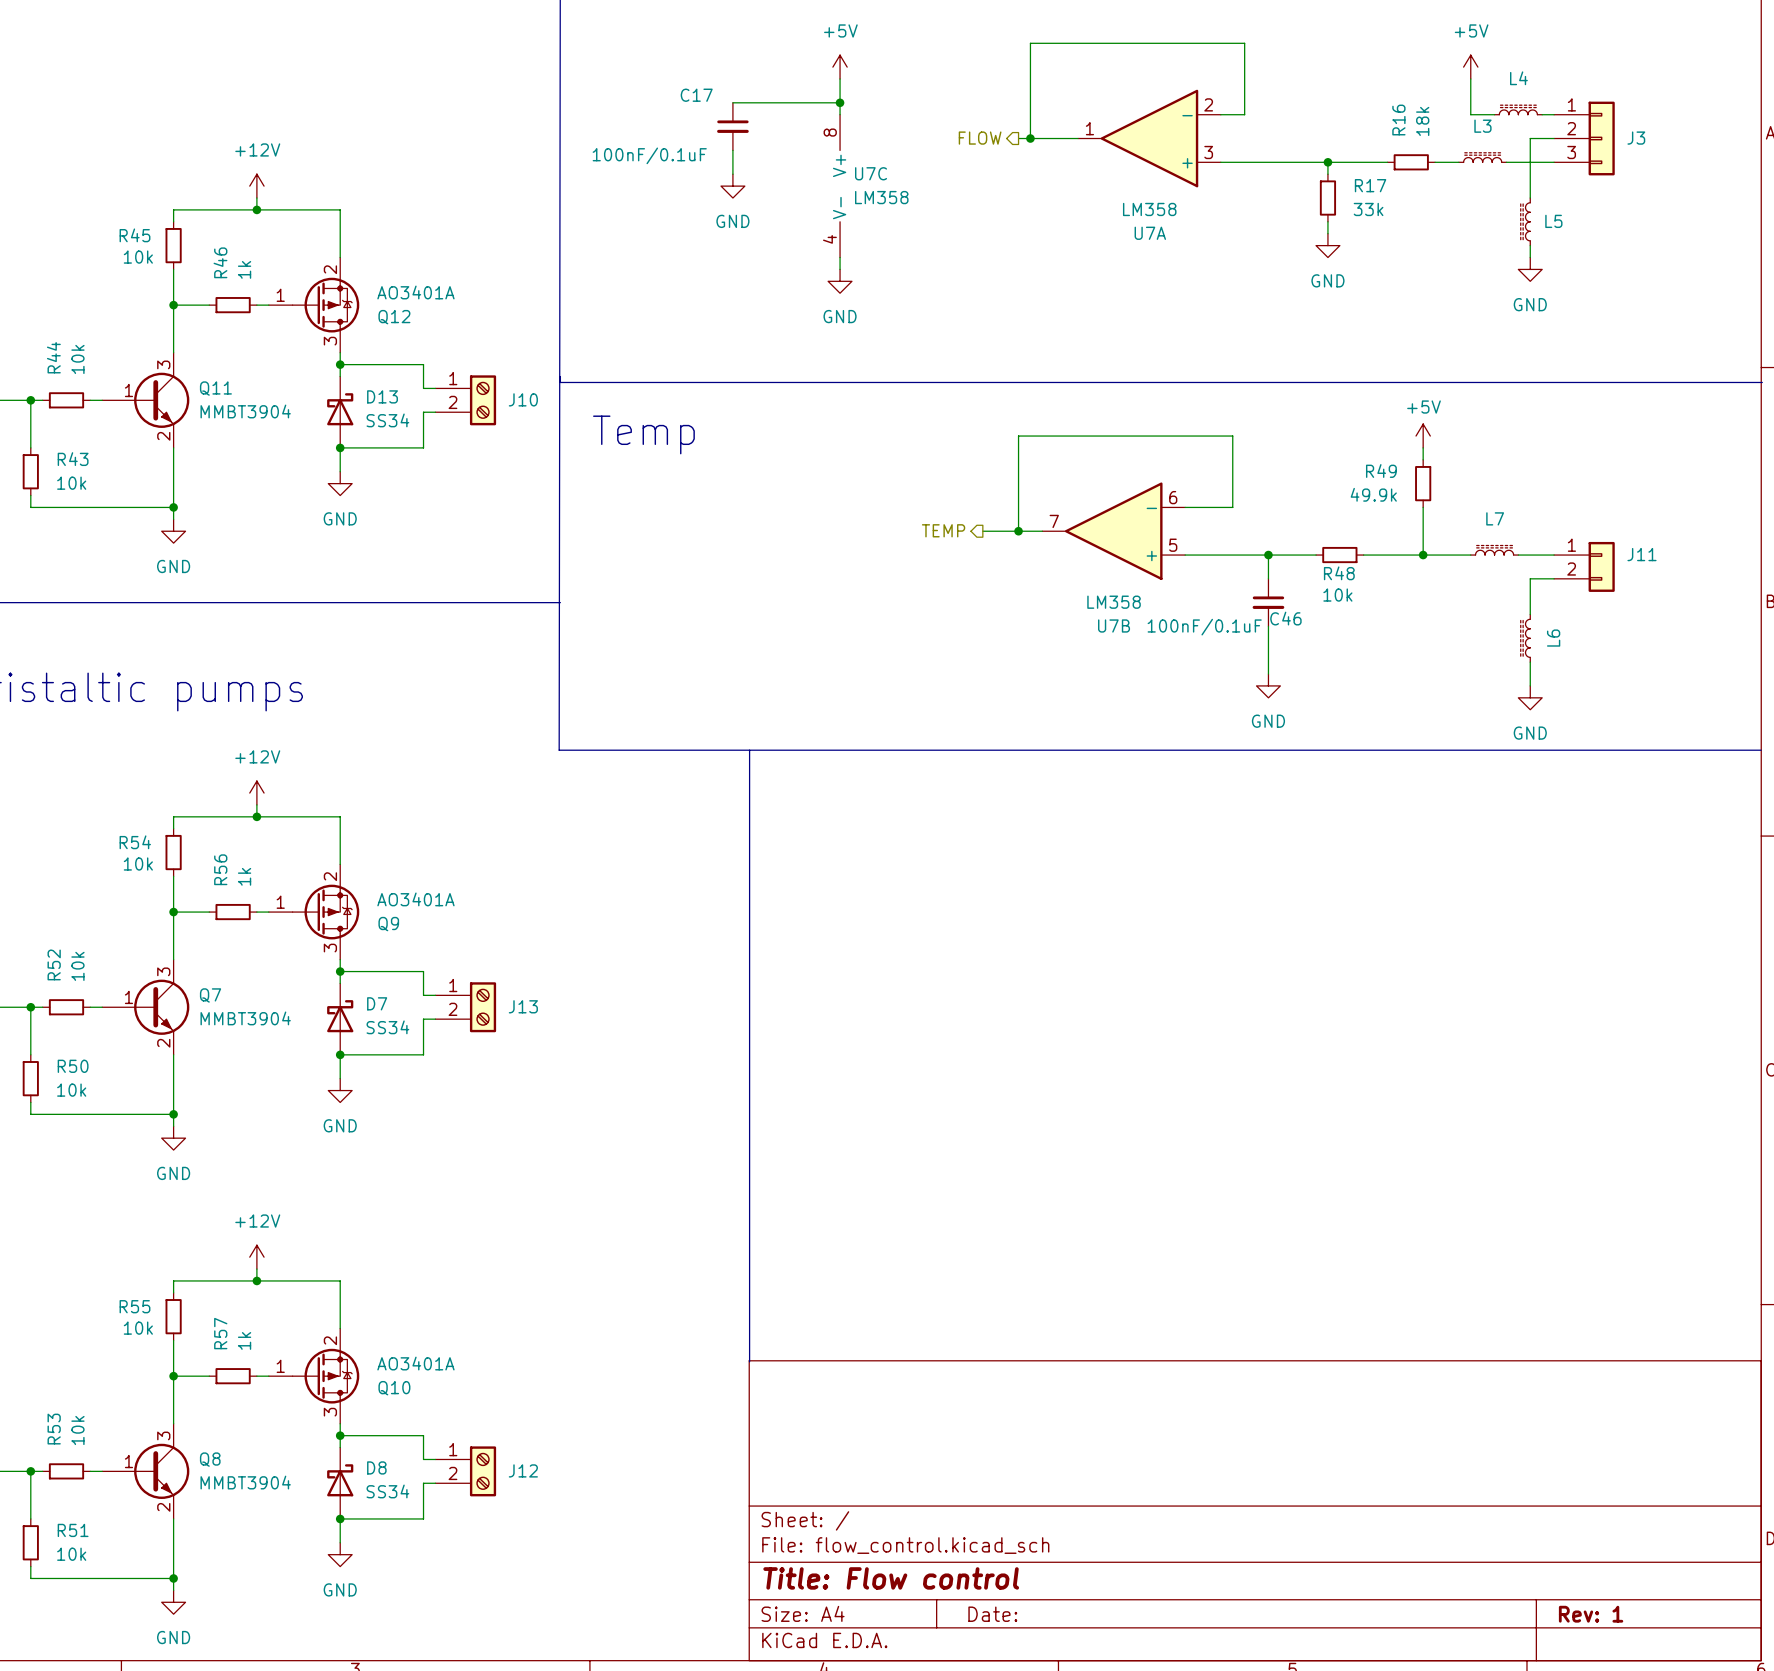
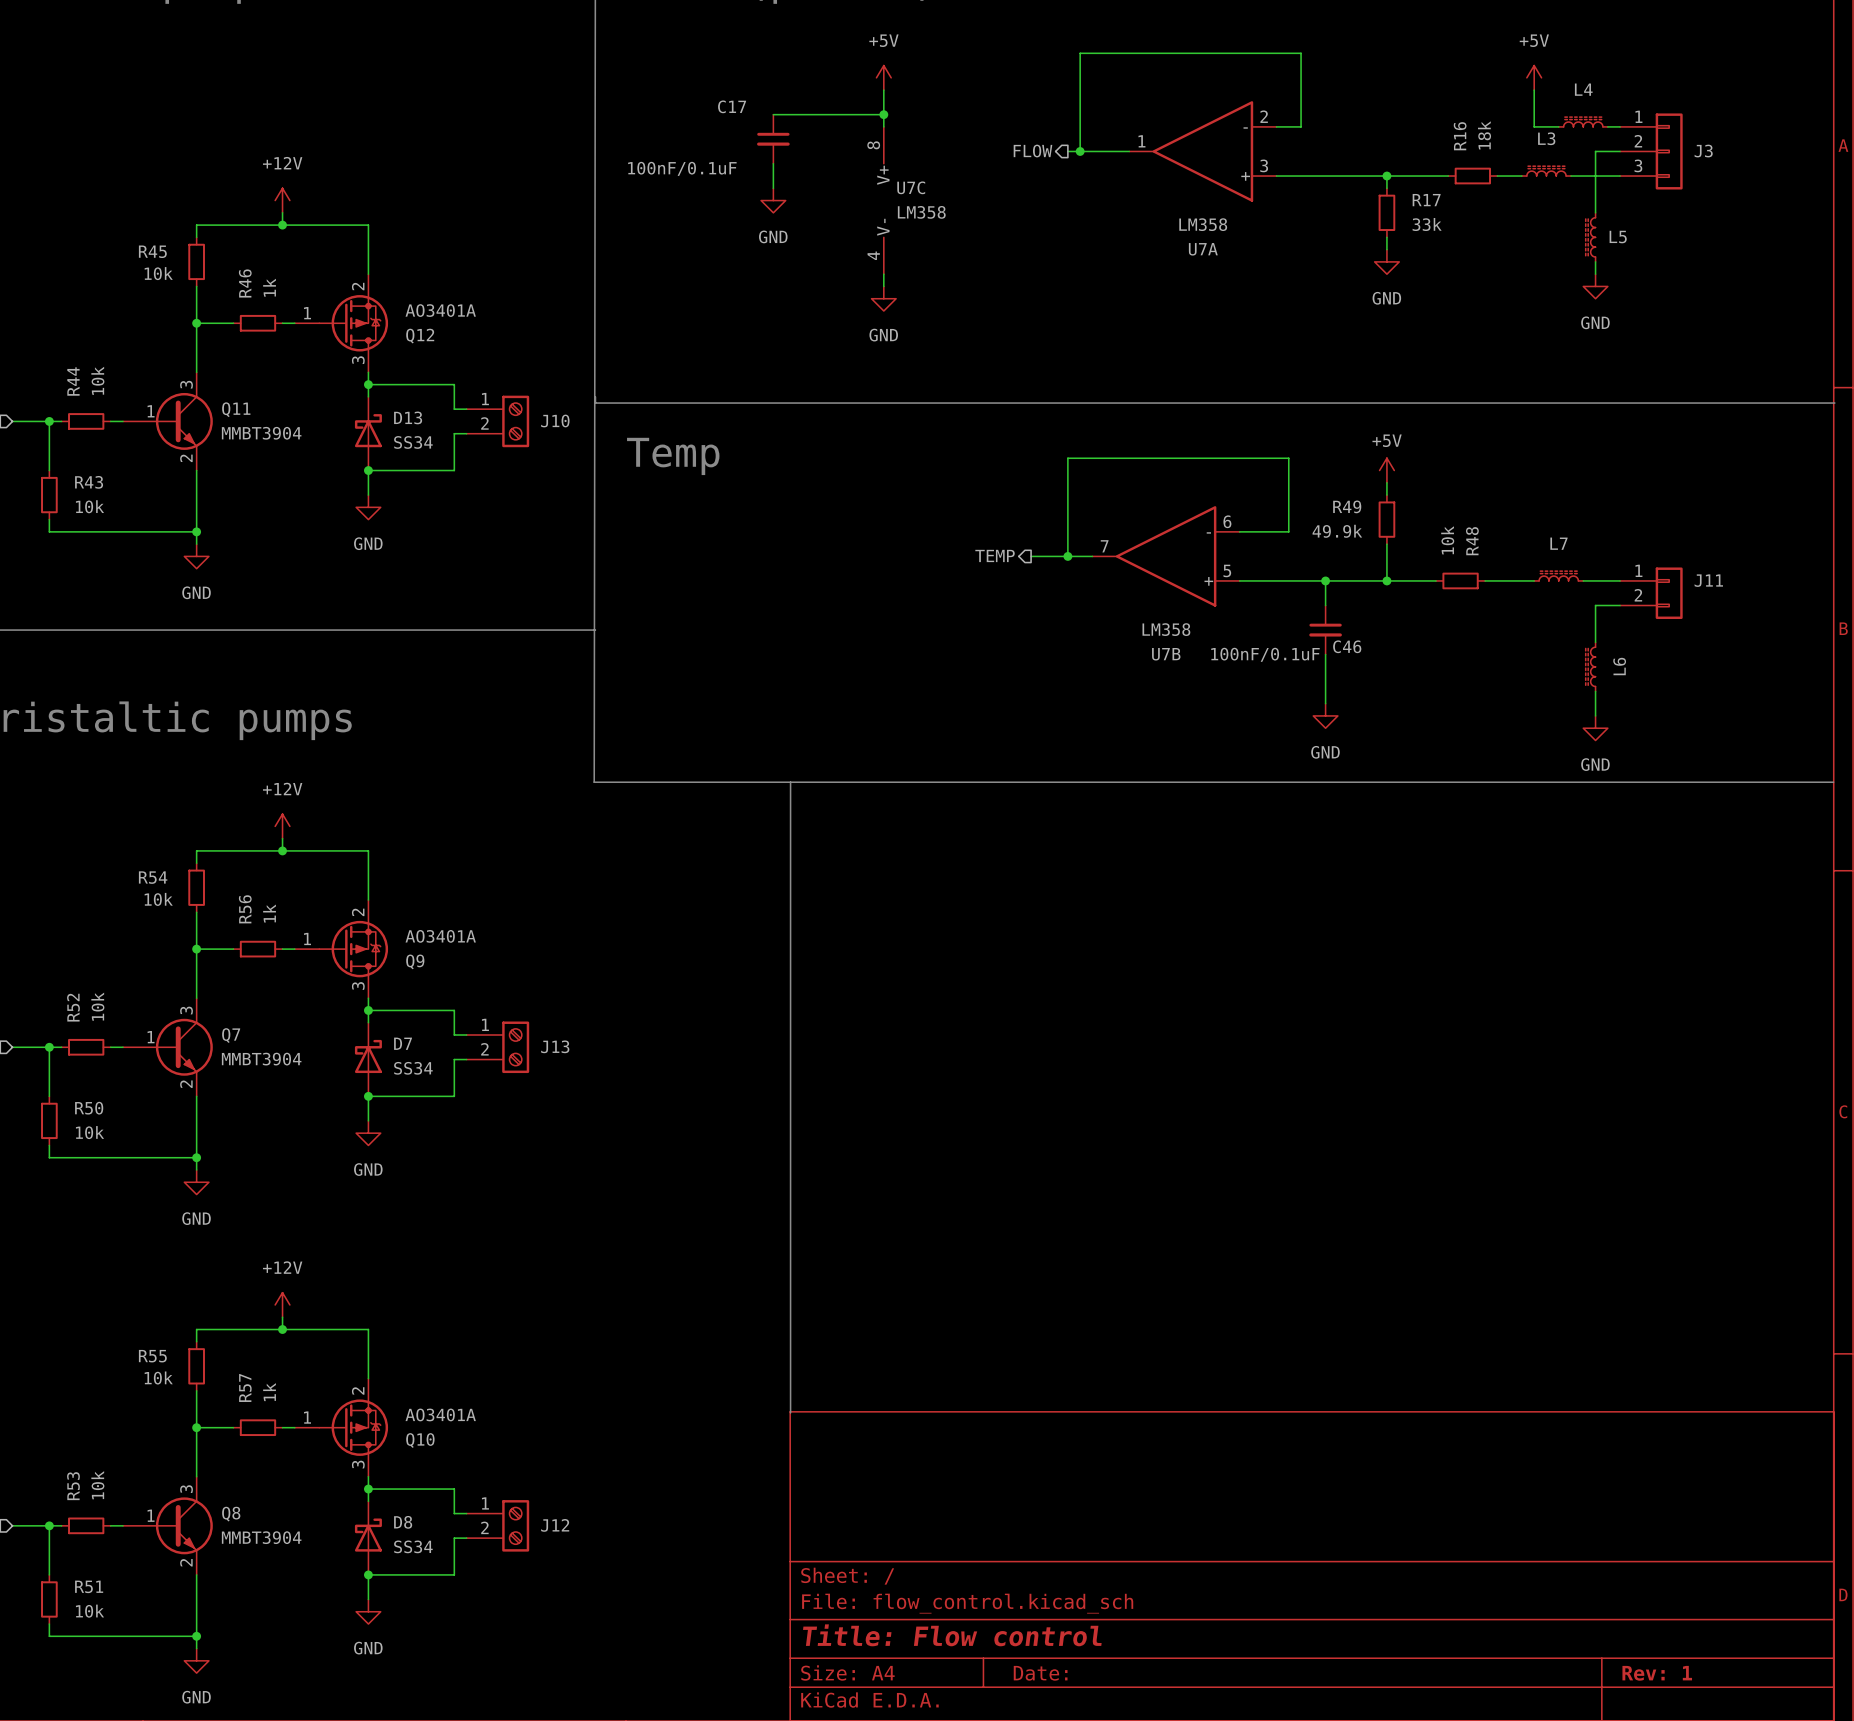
power symbol position: +5V (1423, 436) -> +5V (1386, 470)
wire: (1423, 447) (1423, 459) -> (1386, 482) (1386, 495)
R49 position: (1423, 483) -> (1386, 519)
wire: (1423, 507) (1423, 555) (1375, 555) -> none
wire: none -> (1386, 544) (1386, 580)
wire: none -> (1374, 580) (1423, 580)
junction: none -> (1386, 580)
R48 position: (1339, 555) -> (1460, 580)
junction: (1423, 555) -> none
R48 name rotation: 0° (1339, 573) -> 90° counterclockwise (1472, 541)
R48 name position: R48 (1339, 573) -> R48 (1472, 541)
R48 value rotation: 0° (1337, 595) -> 90° counterclockwise (1447, 540)
R48 value position: 10k (1337, 595) -> 10k (1447, 540)

